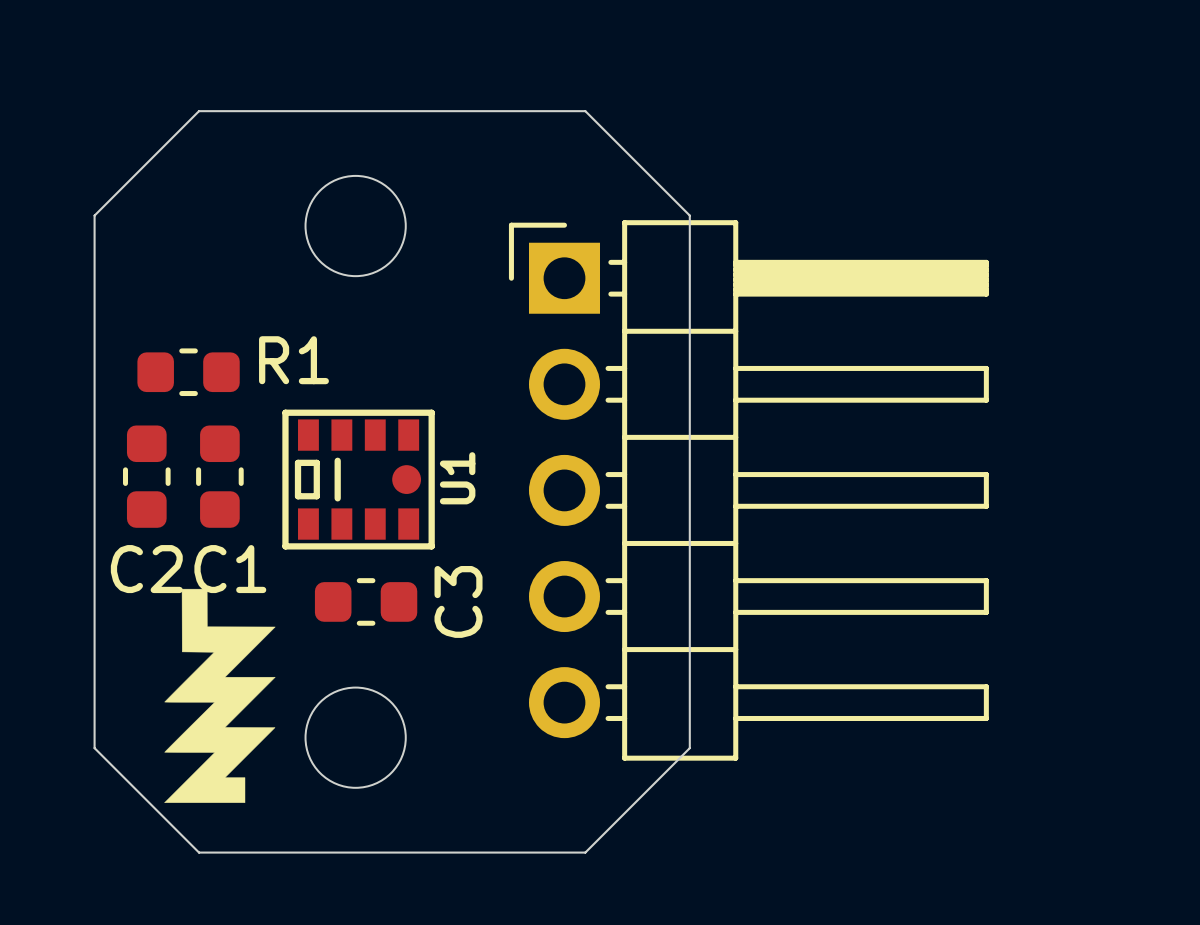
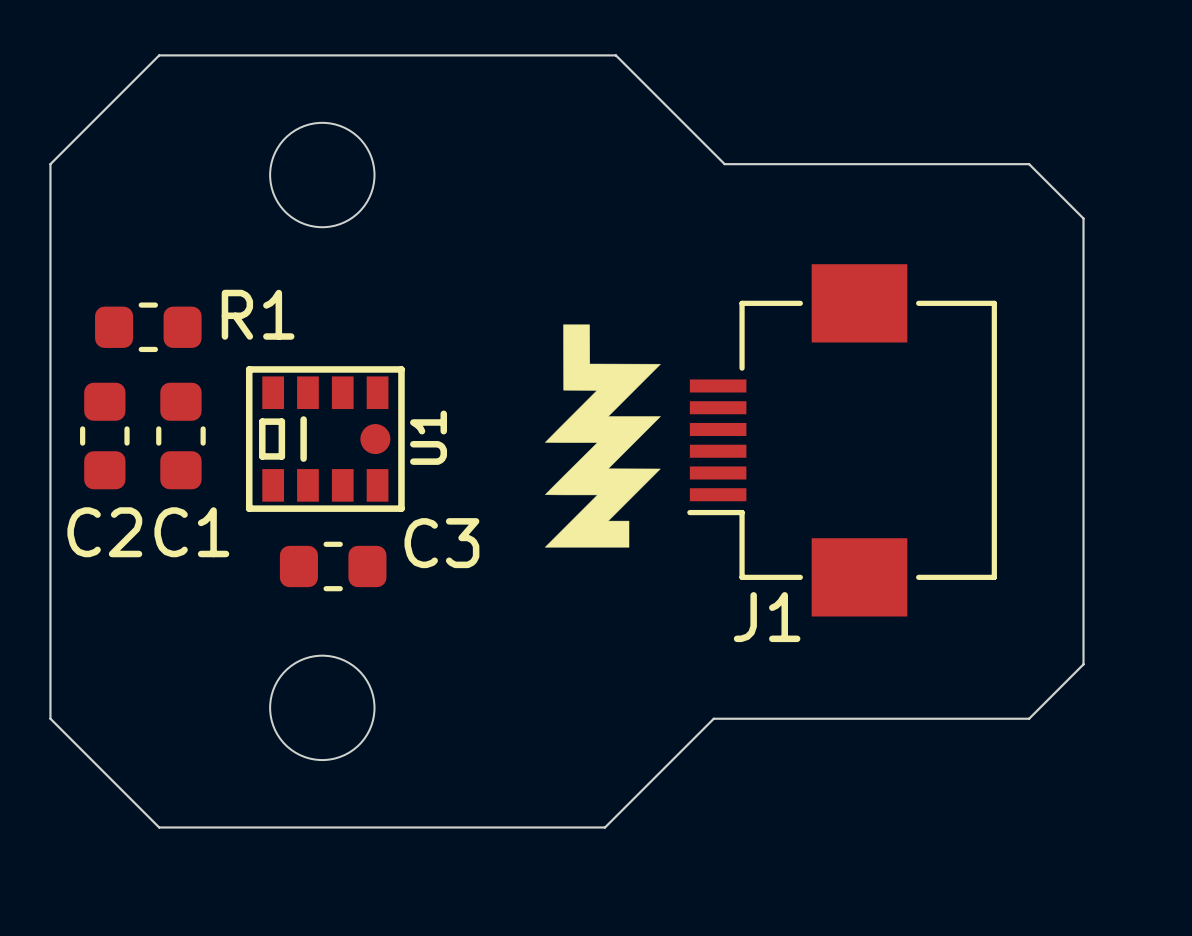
board edge: (585, 111) (689, 215) (689, 748) (585, 852) -> (561, 55) (615, 55) (724, 164) (1029, 164) (1083, 218) (1083, 664) (1029, 718) (713, 718) (605, 827) (561, 827)
J1: none -> (842, 440)
part: (748, 490) -> none
C3 name rotation: 0° (458, 601) -> 90° clockwise (441, 543)
drawing position: (219, 695) -> (602, 436)

